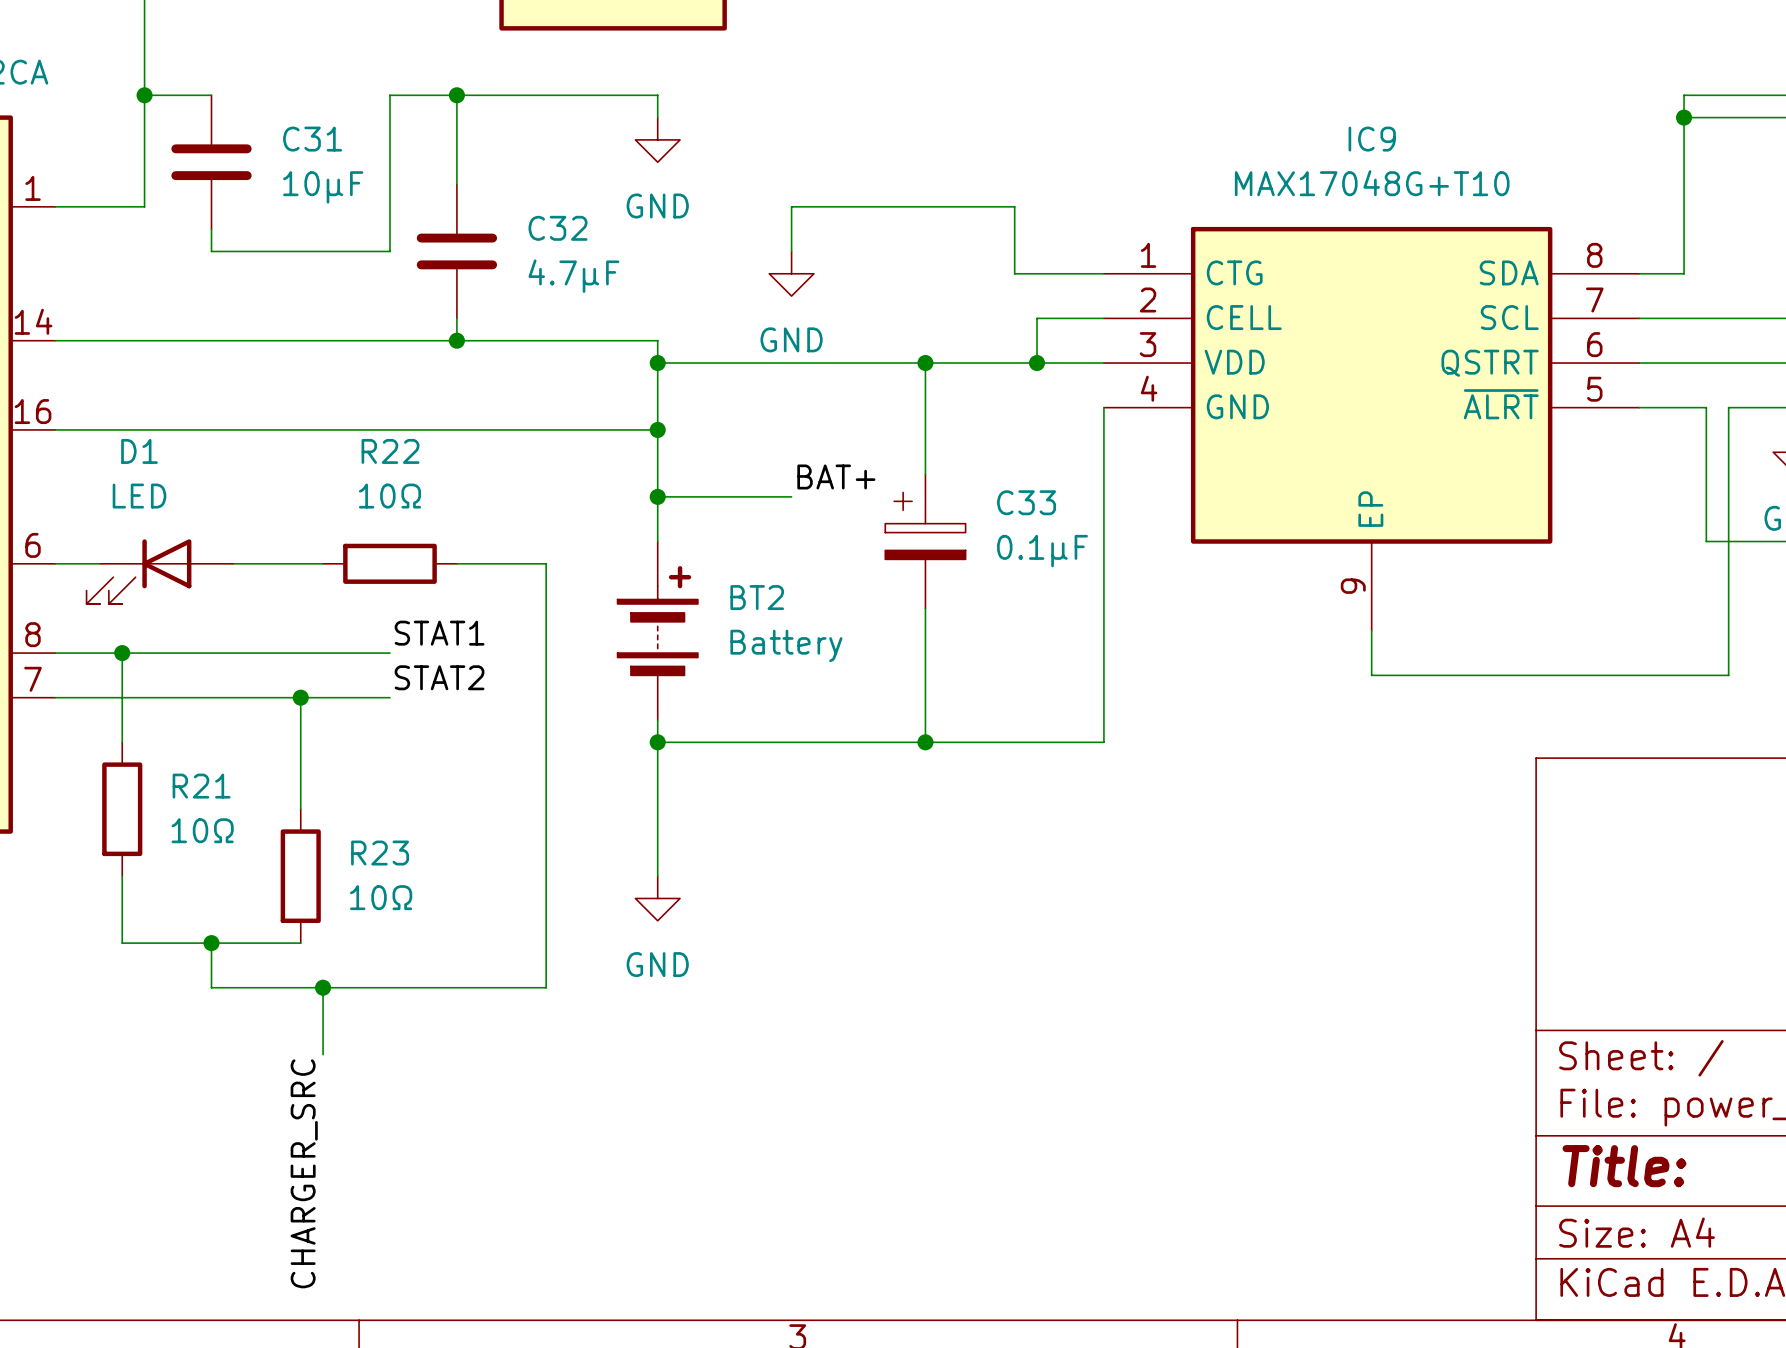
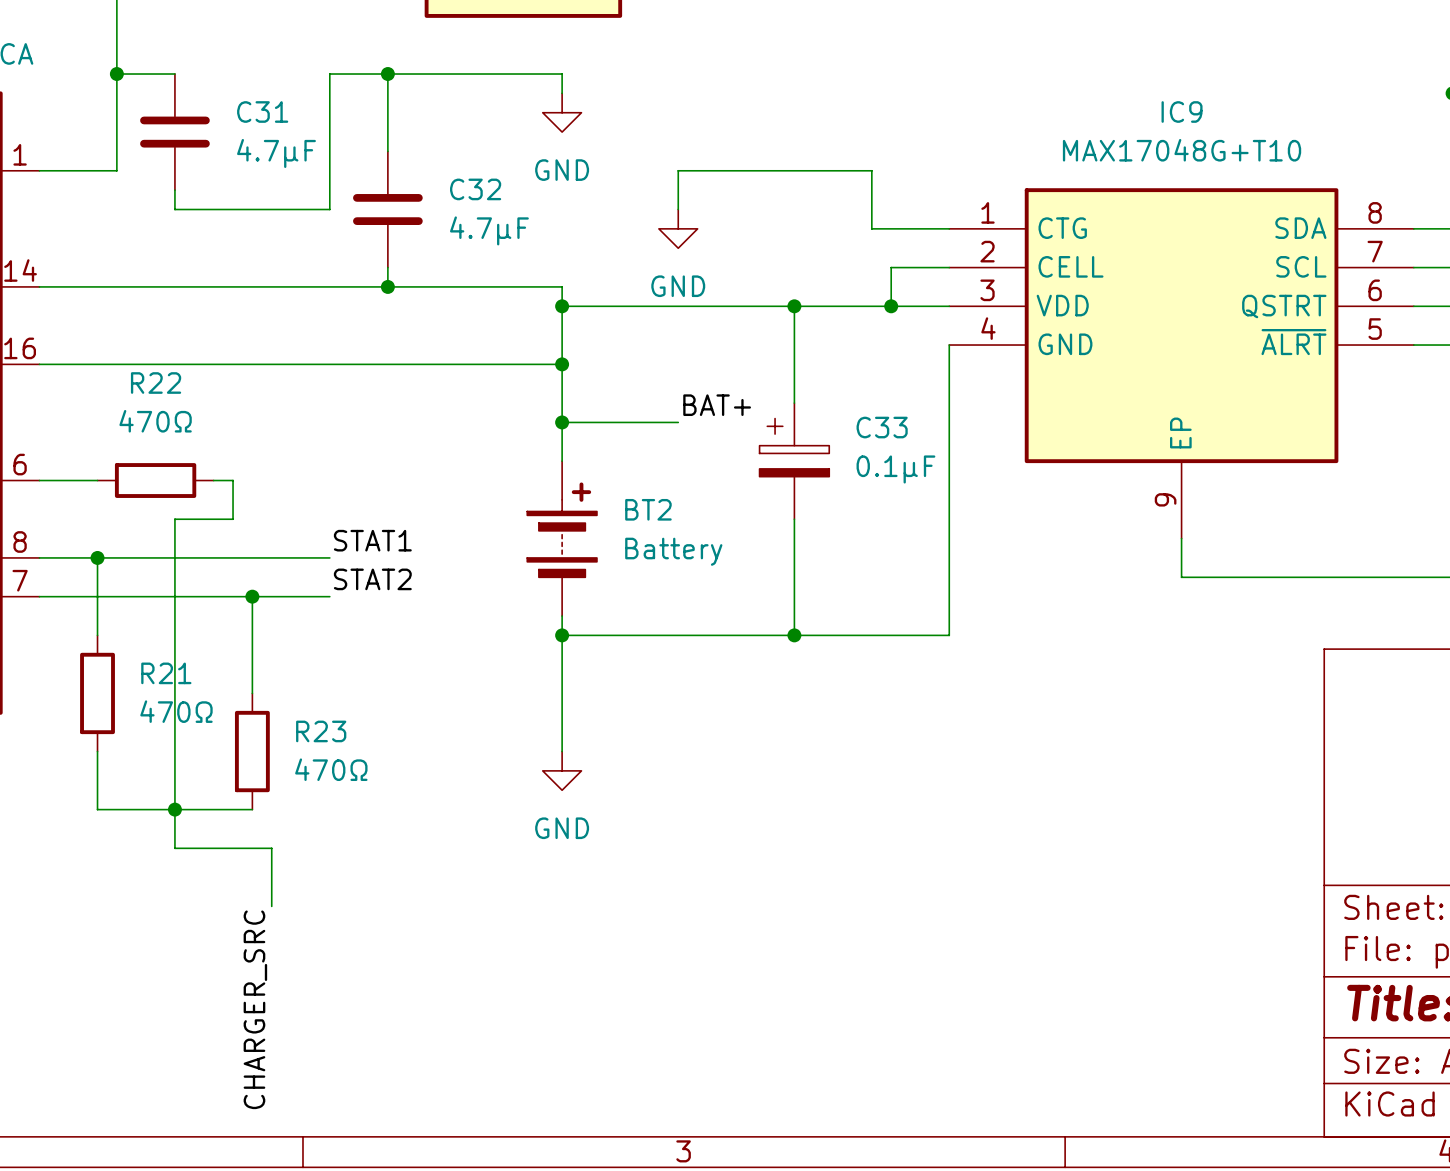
C31 value: 10µF (323, 187) -> 4.7µF (276, 153)
R22 value: 10Ω (389, 496) -> 470Ω (155, 421)
wire: (278, 563) (323, 563) -> (233, 480) (233, 519) (174, 519) (174, 809)
R22 position: (389, 563) -> (155, 480)
wire: (456, 563) (546, 563) (546, 987) (323, 987) -> none
D1: LED (160, 571) -> none
R21 value: 10Ω (202, 830) -> 470Ω (176, 711)
R23 value: 10Ω (381, 897) -> 470Ω (331, 769)
junction: (323, 987) -> none

